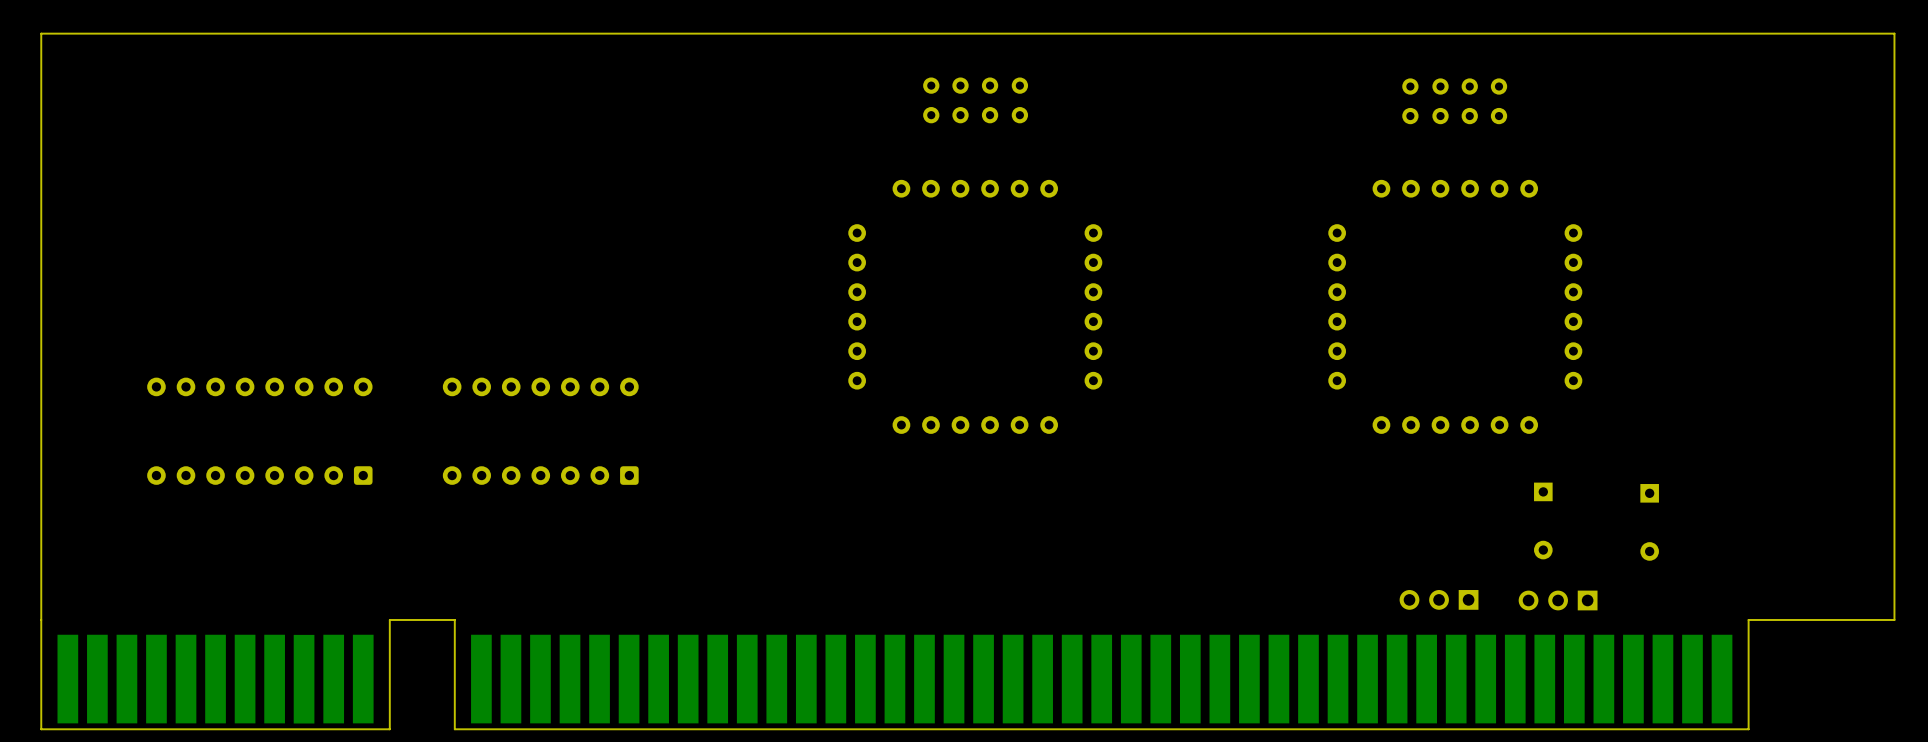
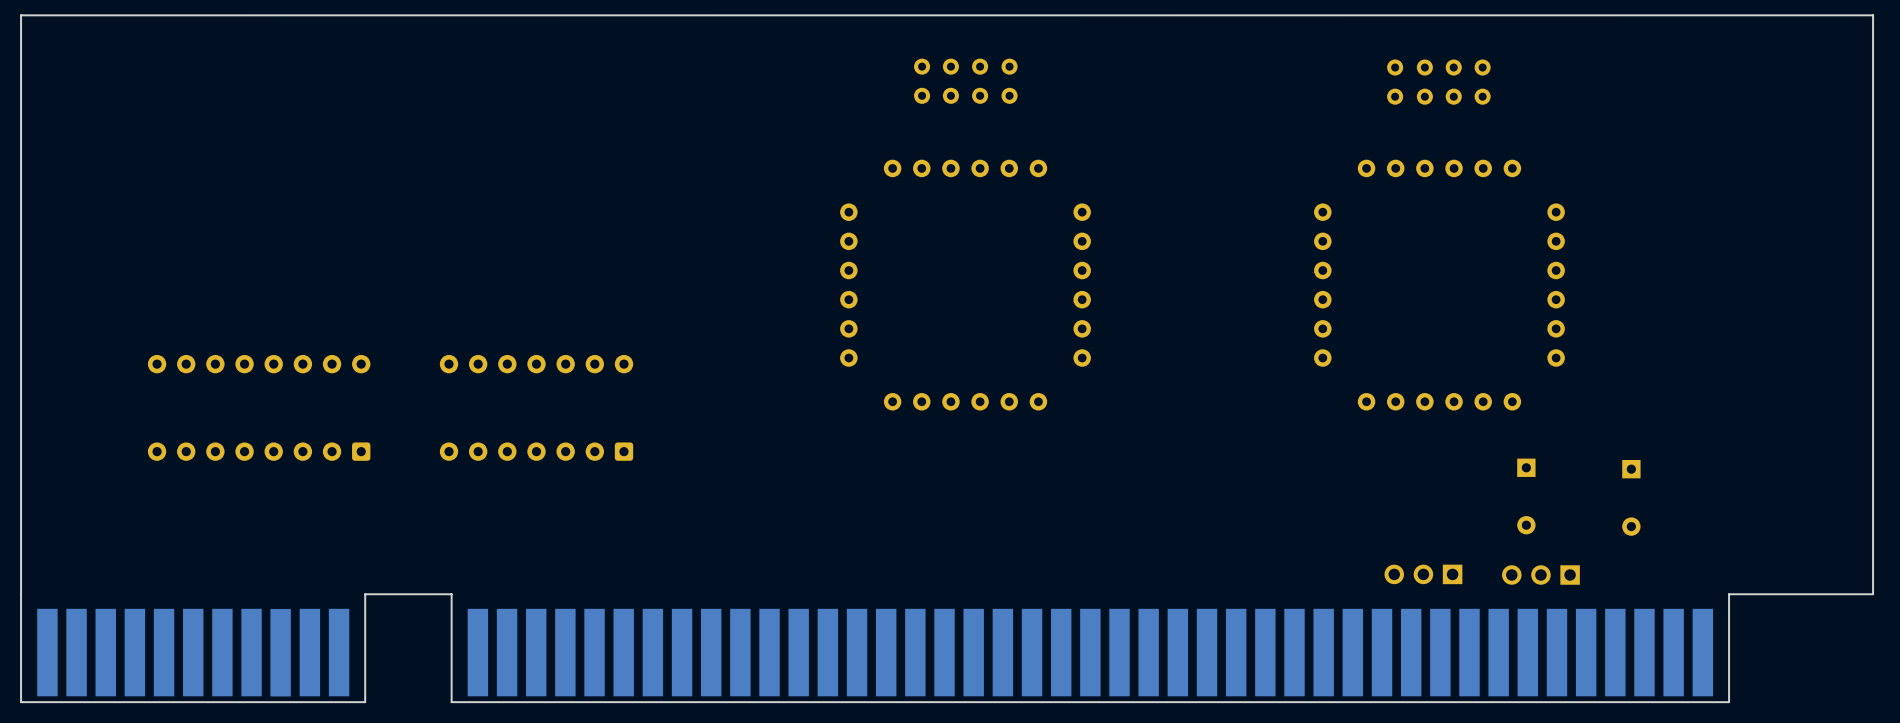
board edge: (41, 33) (41, 619) -> (43, 15) (21, 15) (21, 594)
part footprint: [40, 619, 1749, 730] -> [20, 593, 1730, 703]

